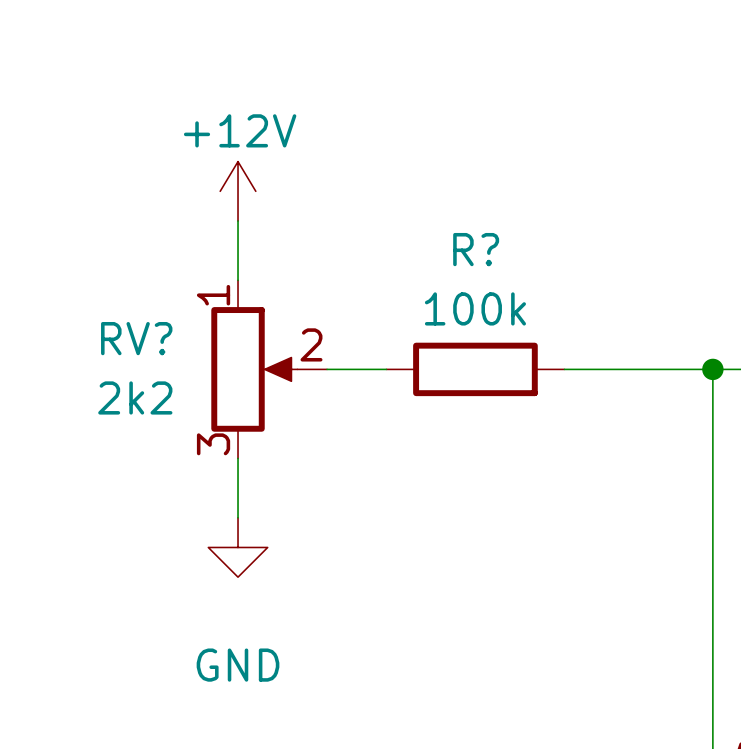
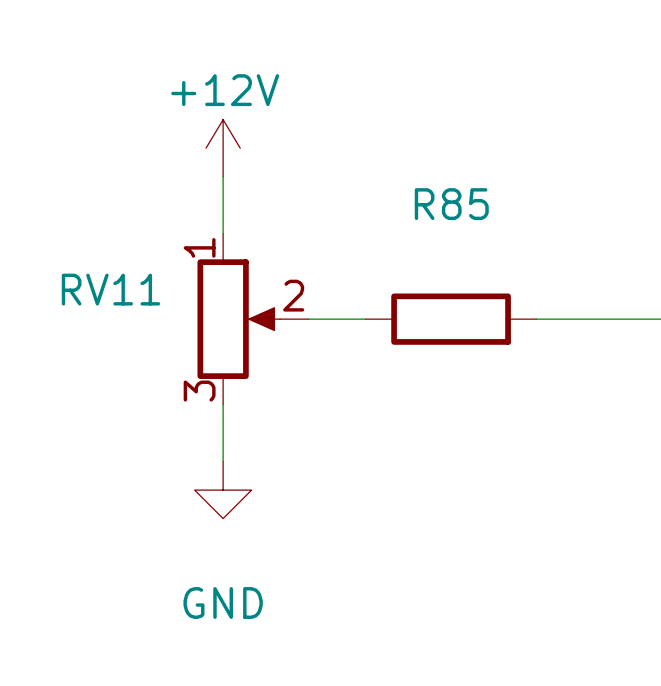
R? name: R? (476, 249) -> R85 (451, 204)
R? value: 100k (475, 308) -> none
RV? name: RV? (136, 338) -> RV11 (110, 289)
RV? value: 2k2 (135, 397) -> none

